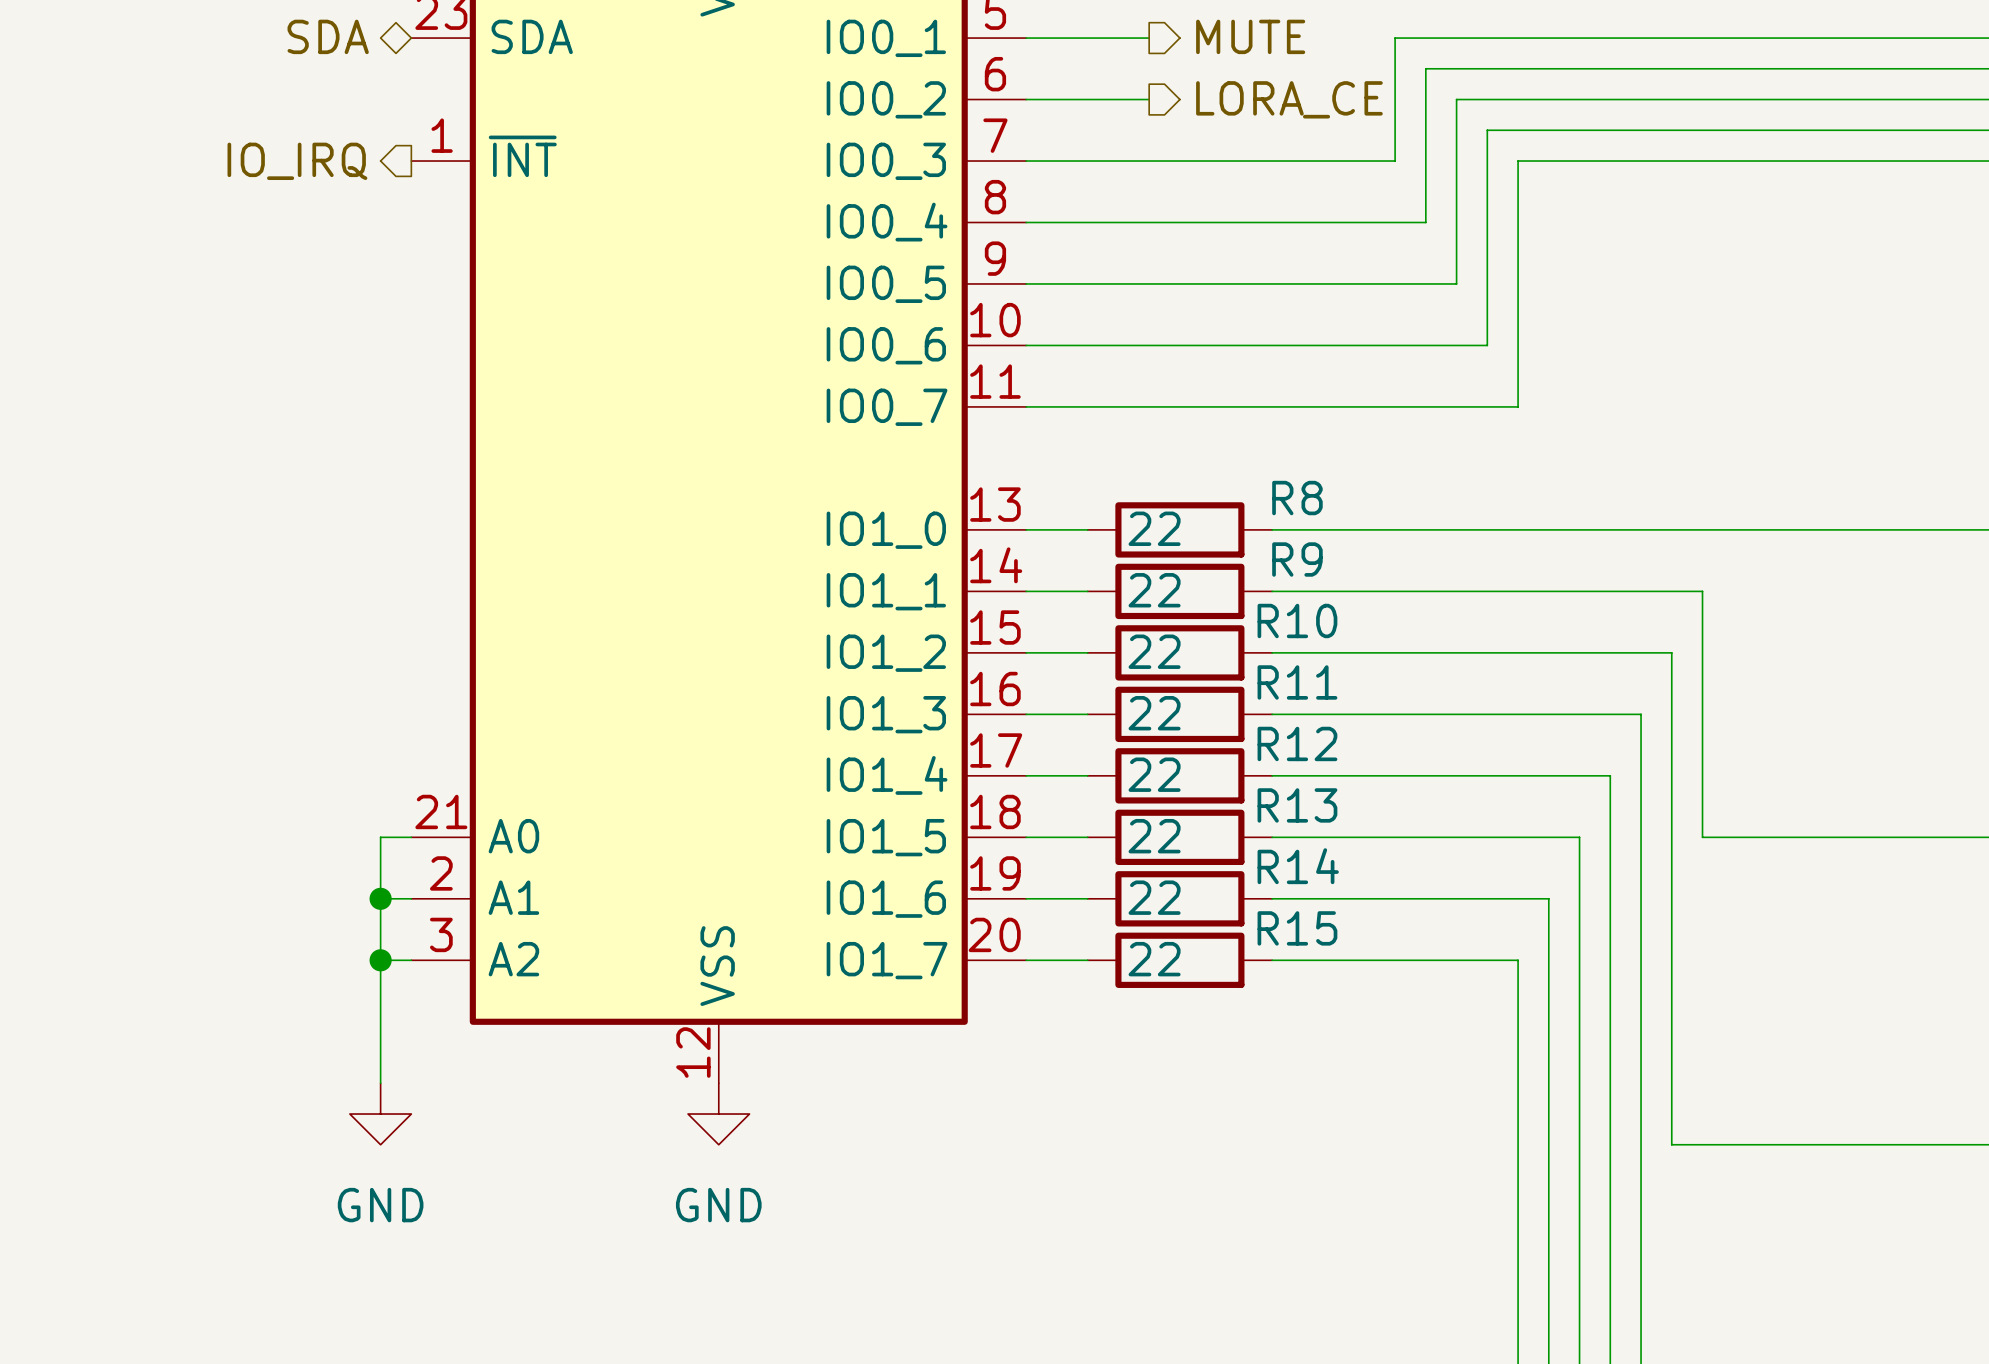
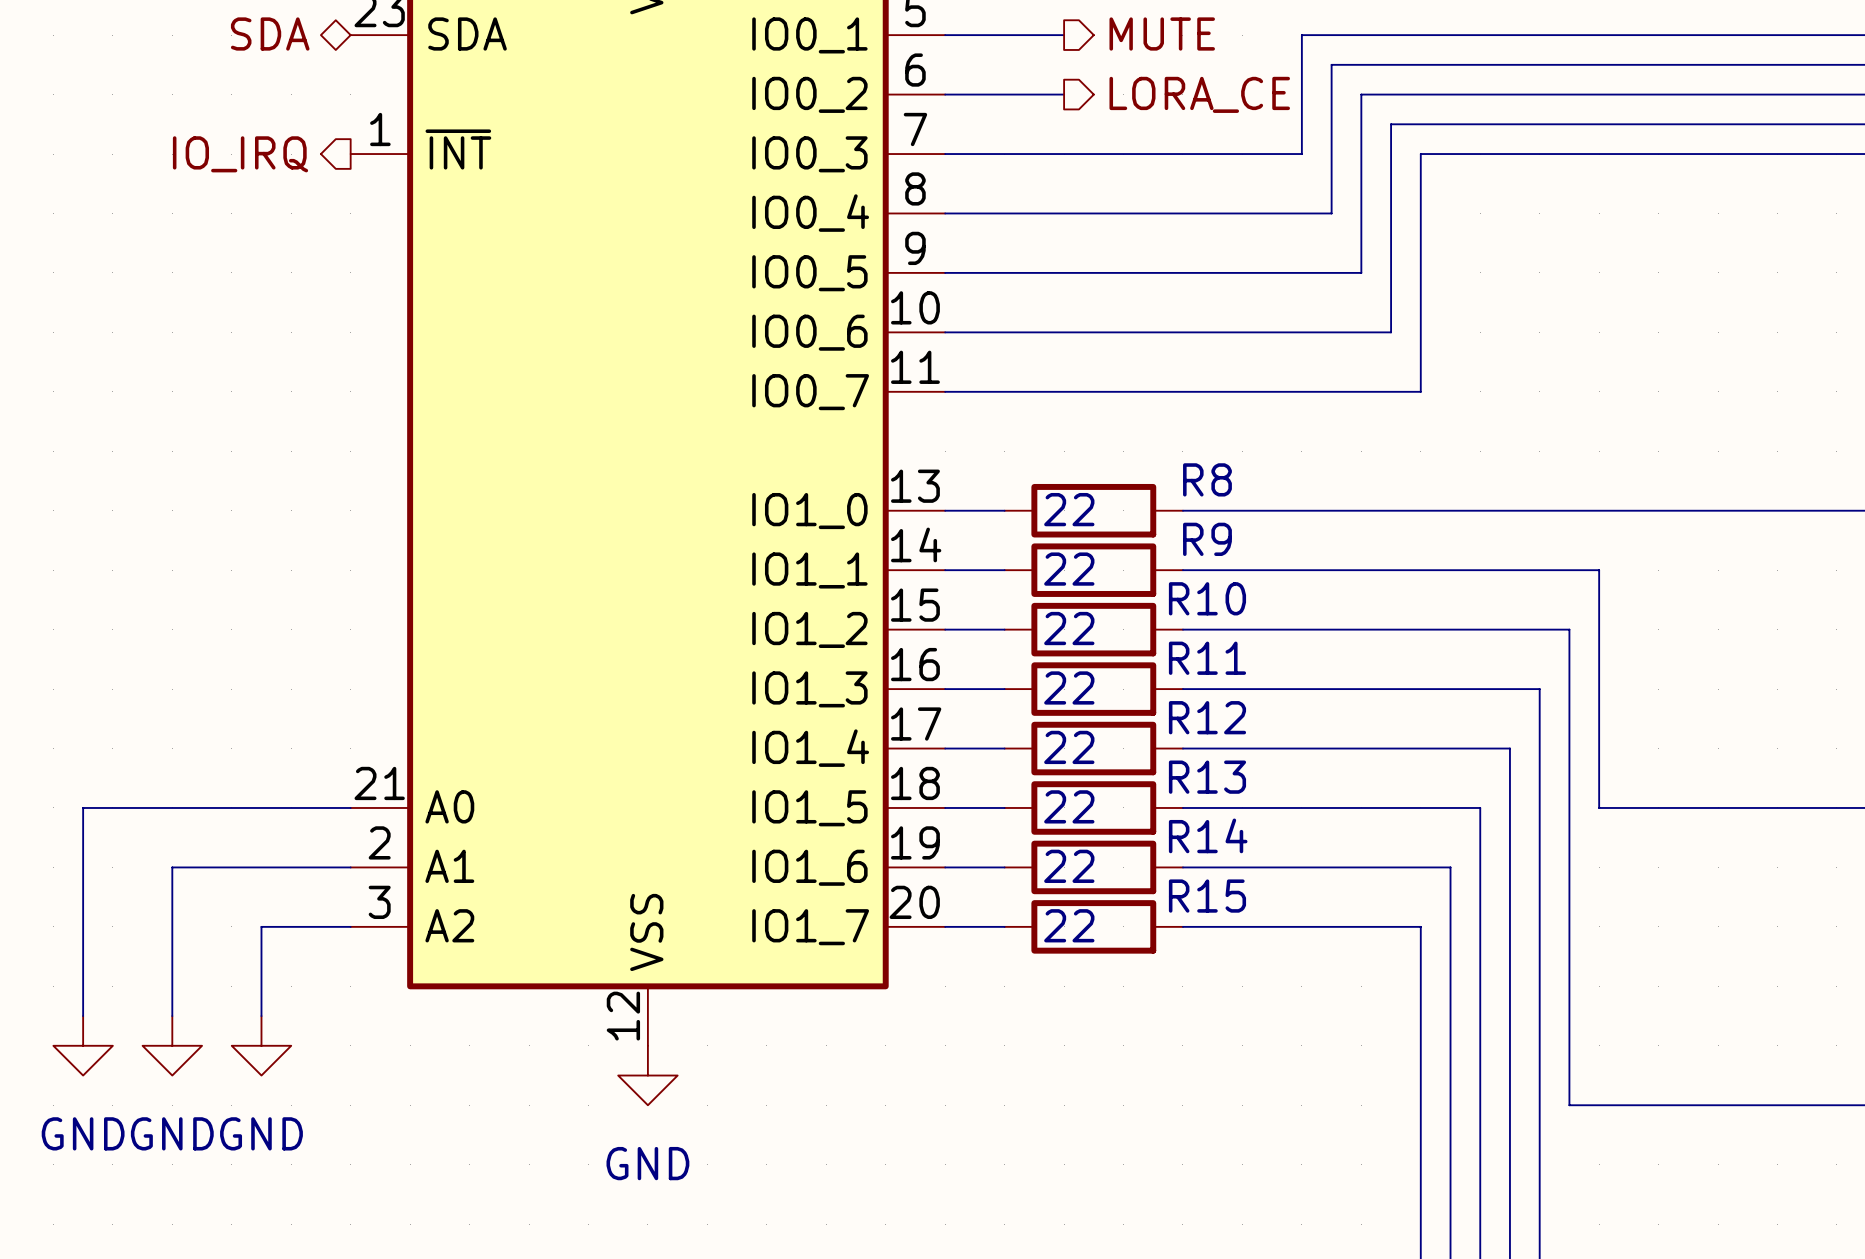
wire: (380, 837) (380, 1083) -> (320, 807) (83, 807) (83, 1016)
wire: none -> (320, 867) (172, 867) (172, 1016)
junction: (380, 898) -> none
wire: none -> (320, 926) (261, 926) (261, 1016)
junction: (380, 960) -> none
power symbol: none -> GND (83, 1045)
power symbol: none -> GND (172, 1045)
power symbol position: GND (380, 1114) -> GND (261, 1045)

